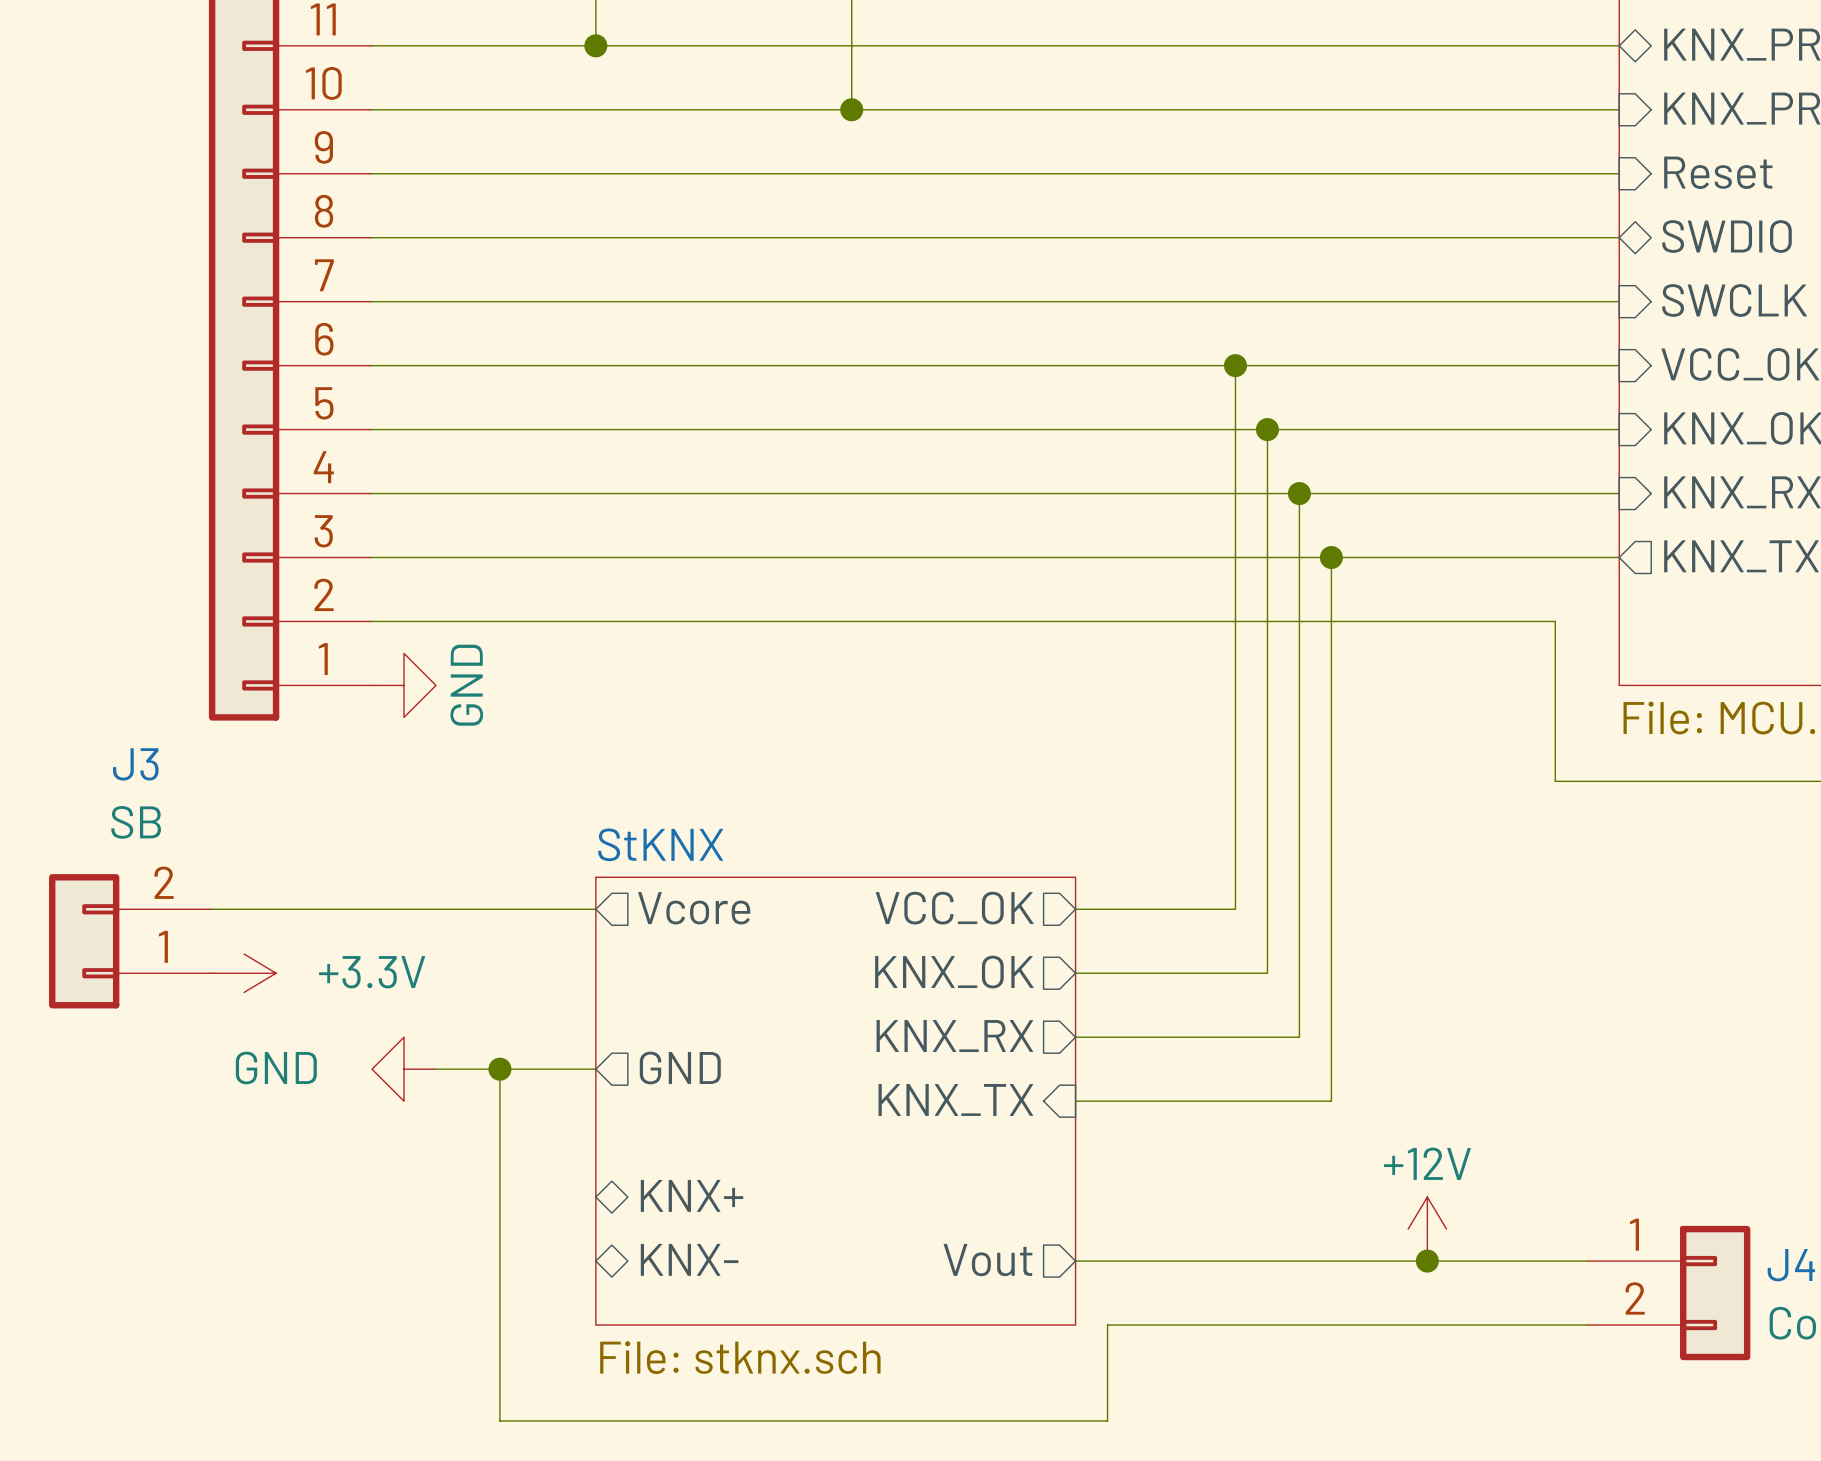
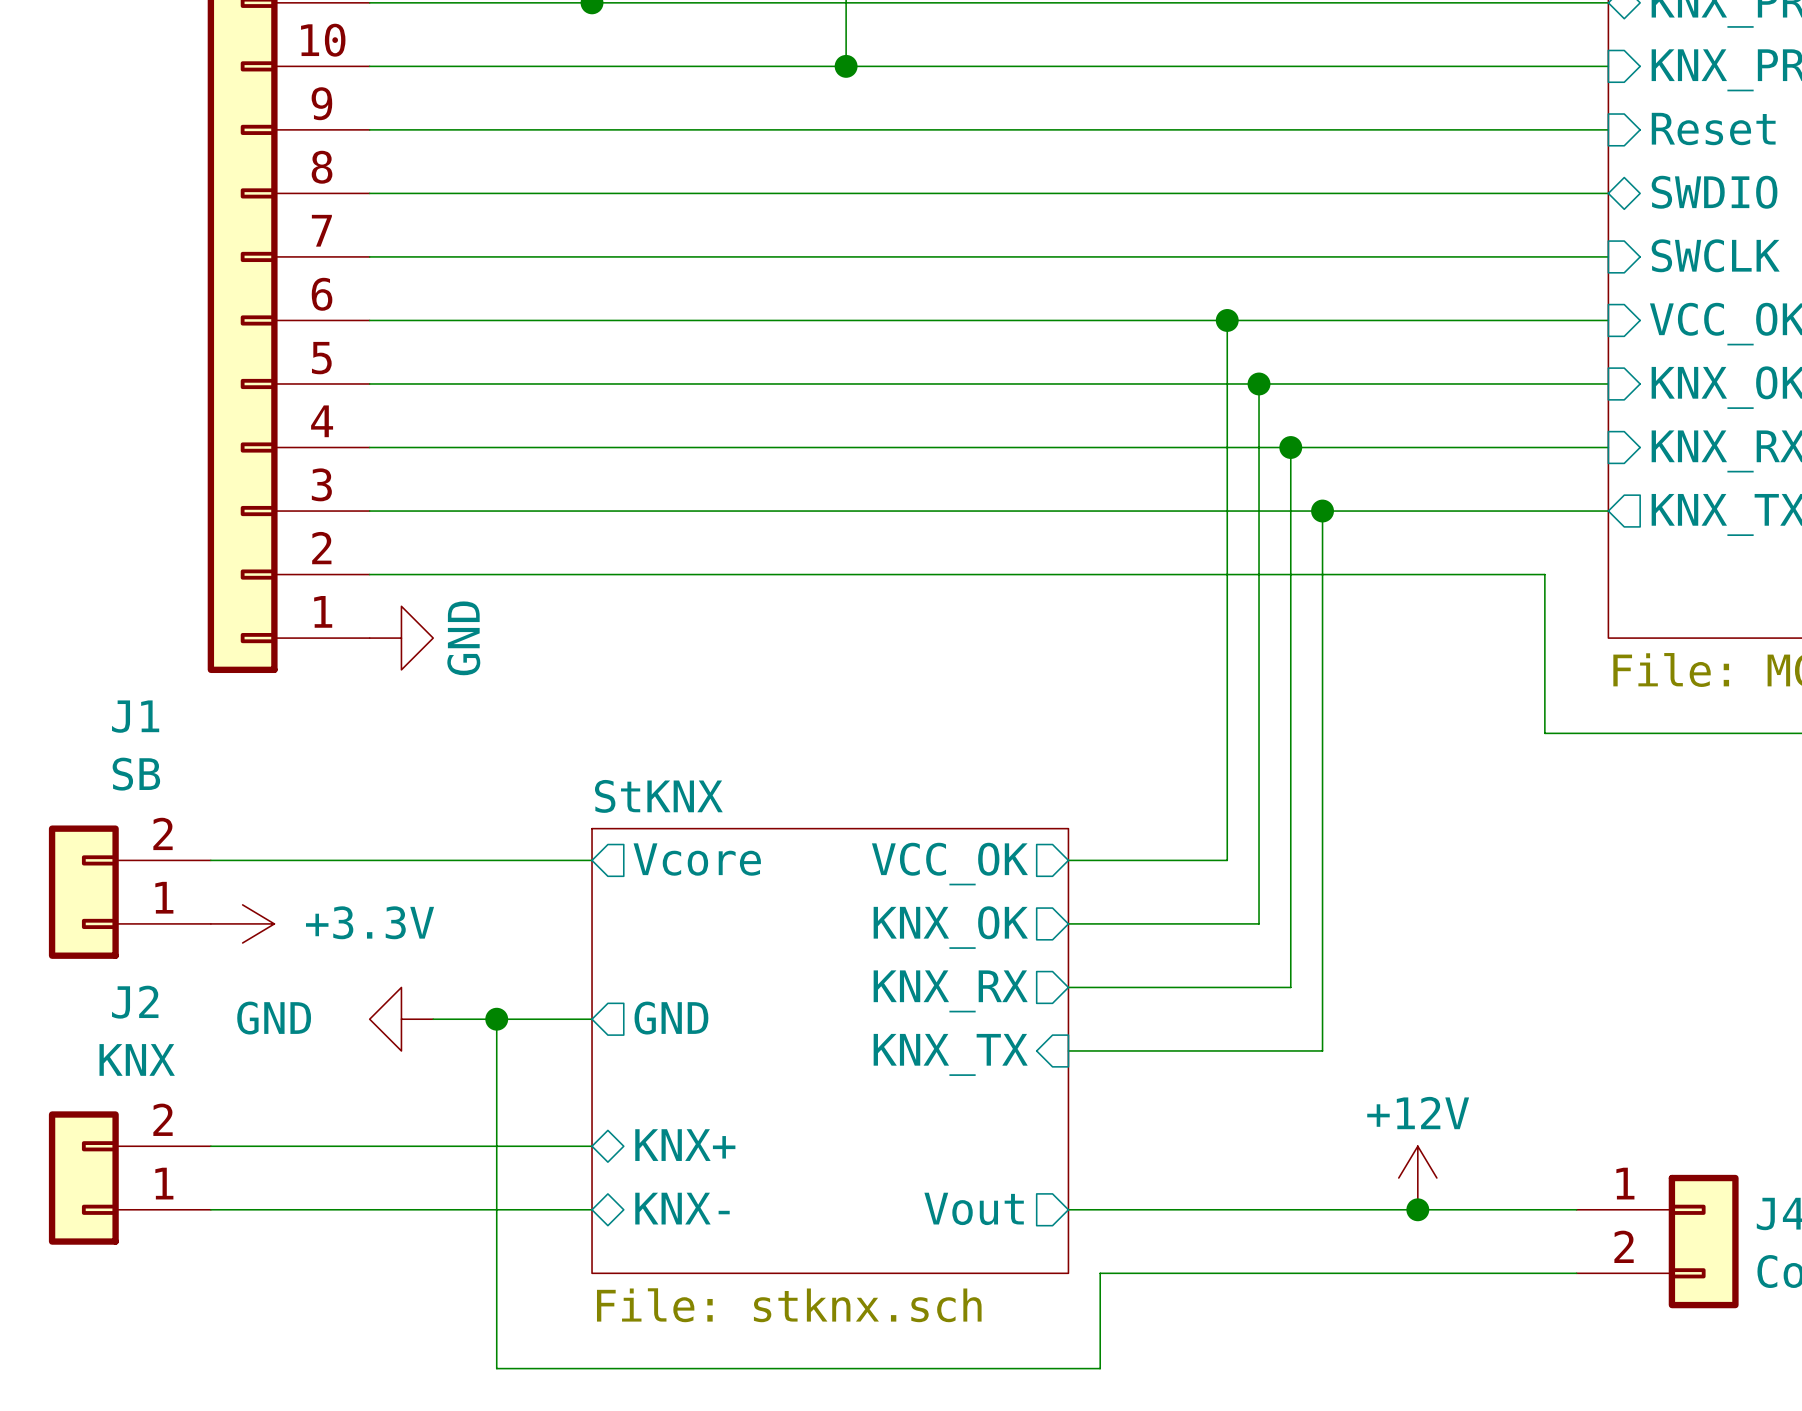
J3 name: J3 (135, 764) -> J1 (135, 716)
wire: none -> (210, 1146) (592, 1146)
J2: none -> KNX (129, 1178)
wire: none -> (210, 1209) (592, 1209)

